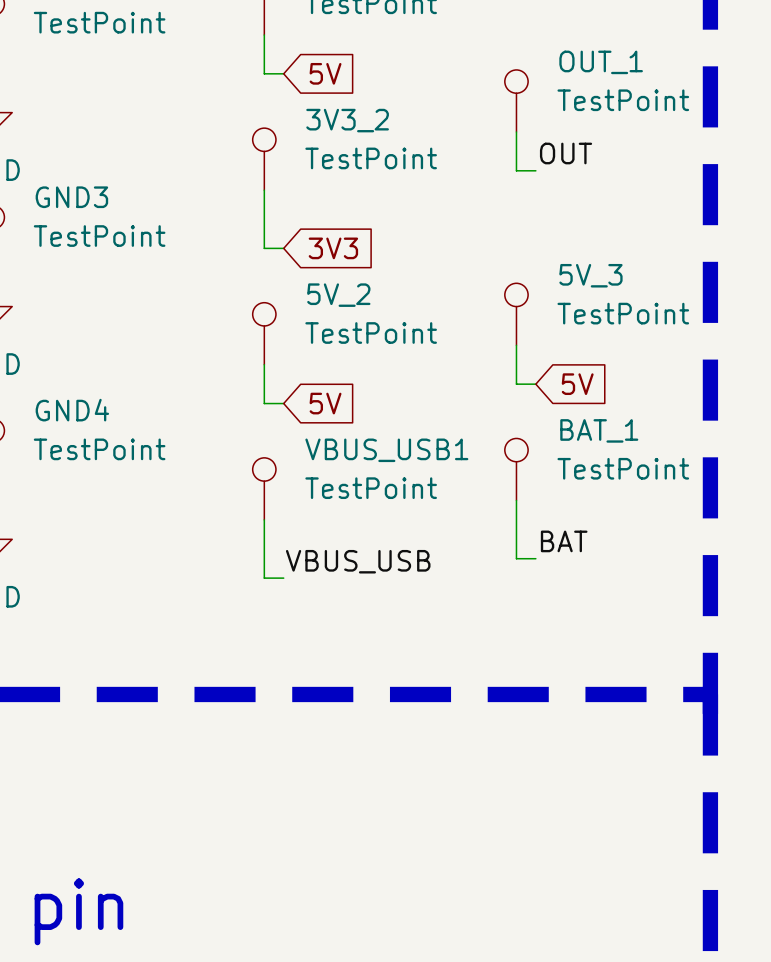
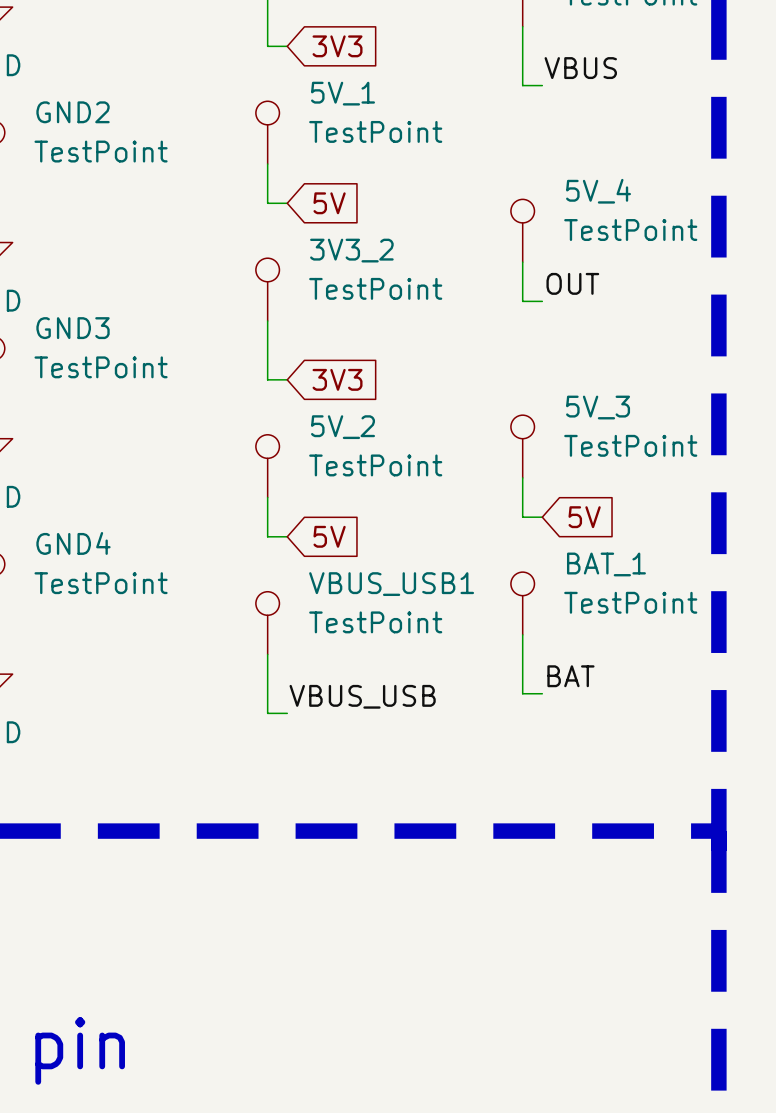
OUT_1 name: OUT_1 (601, 62) -> 5V_4 (598, 191)

